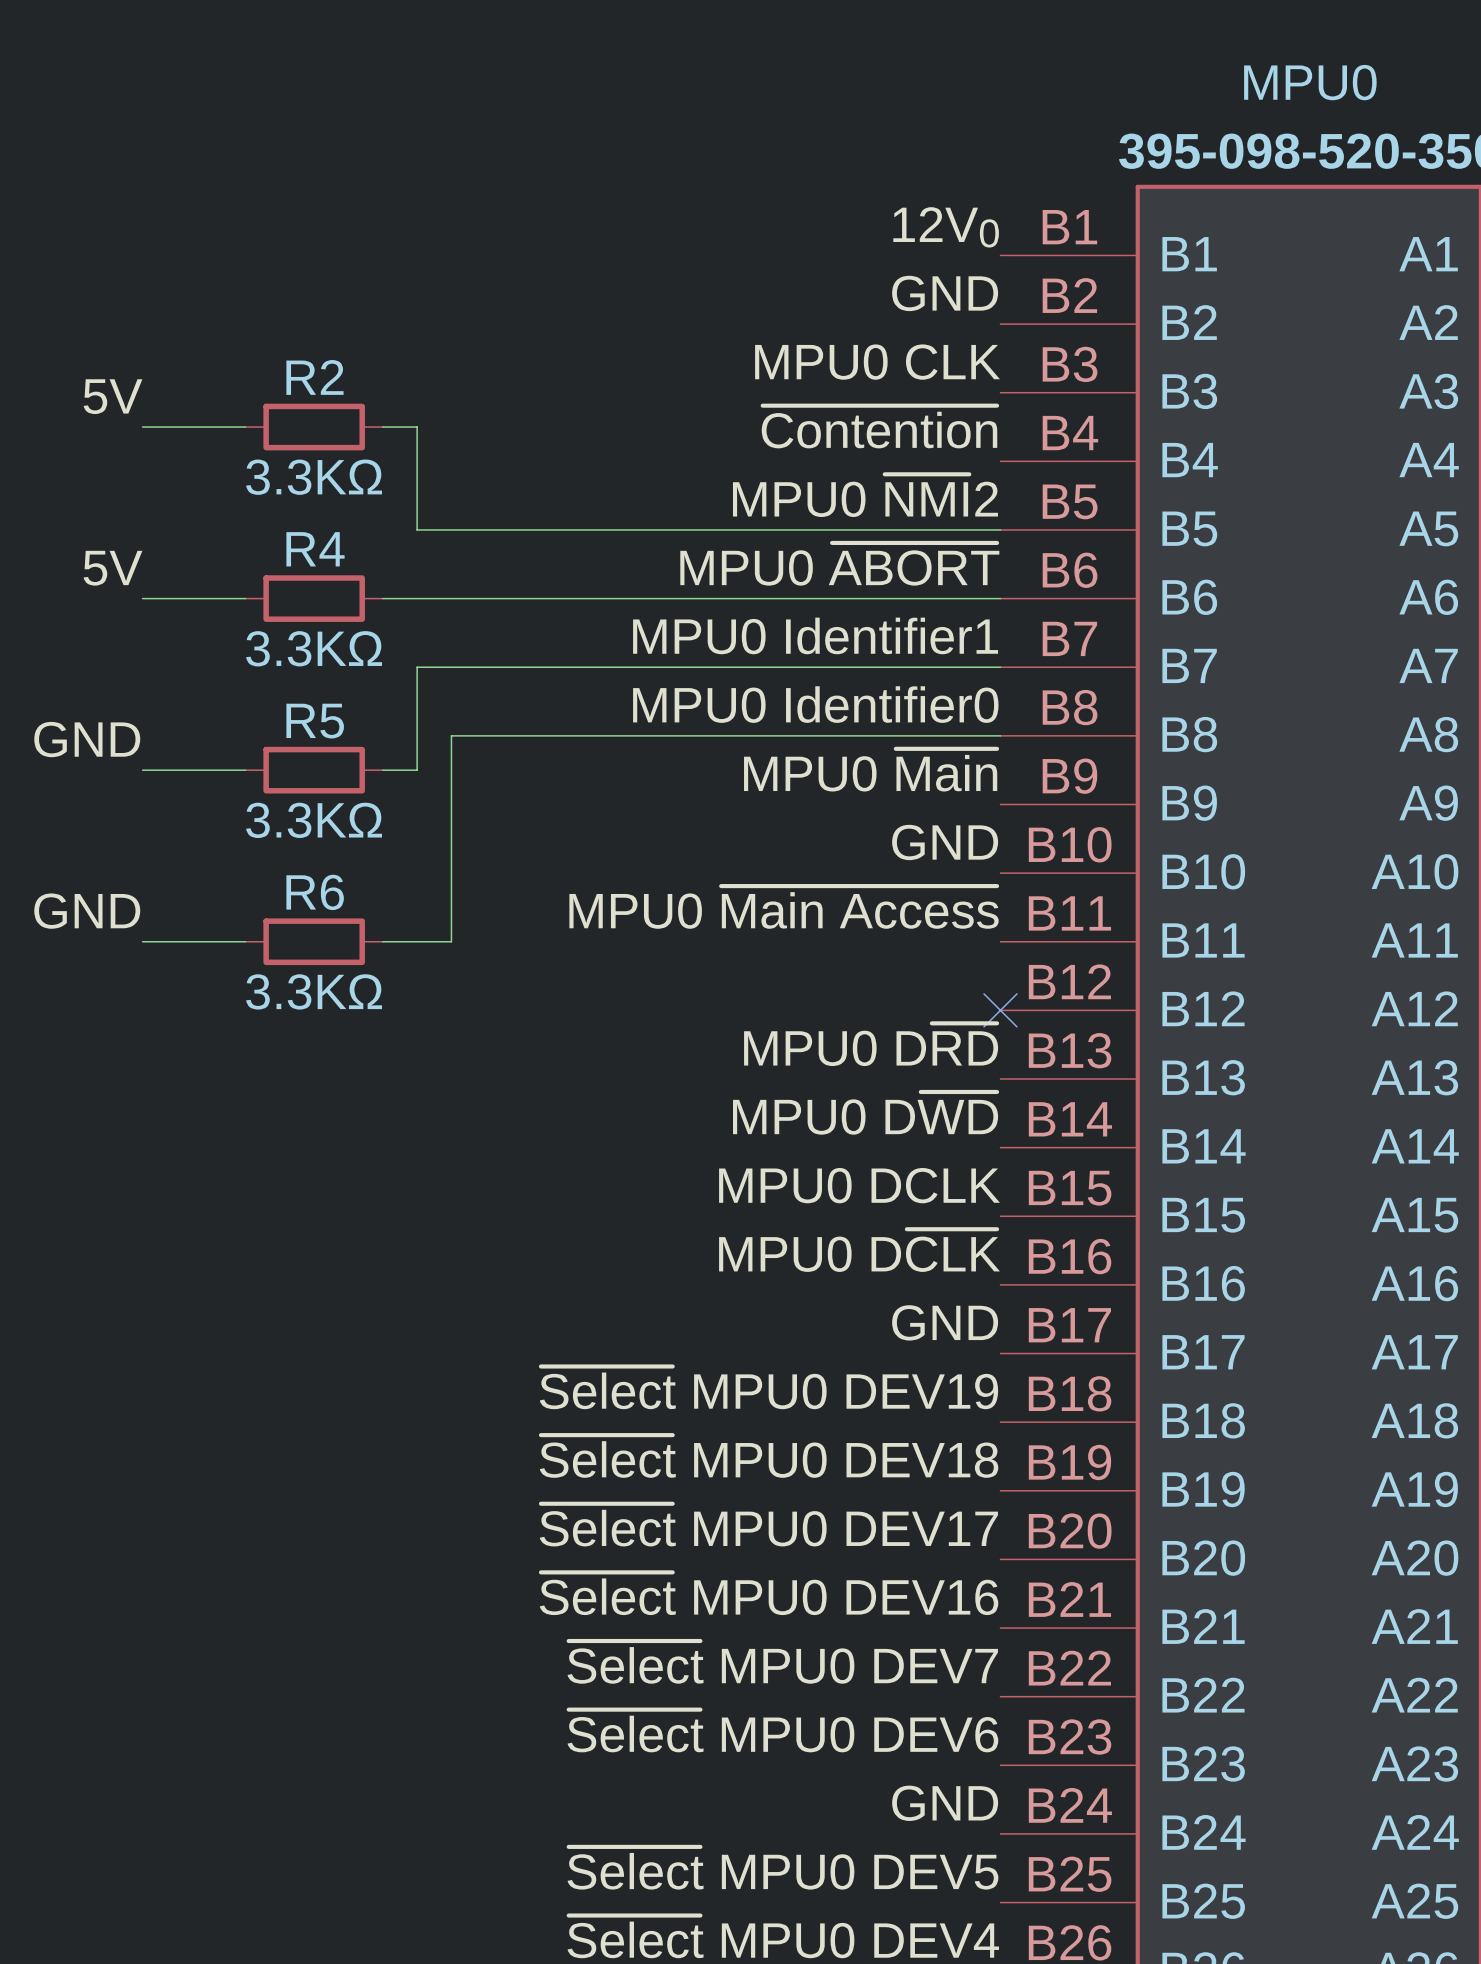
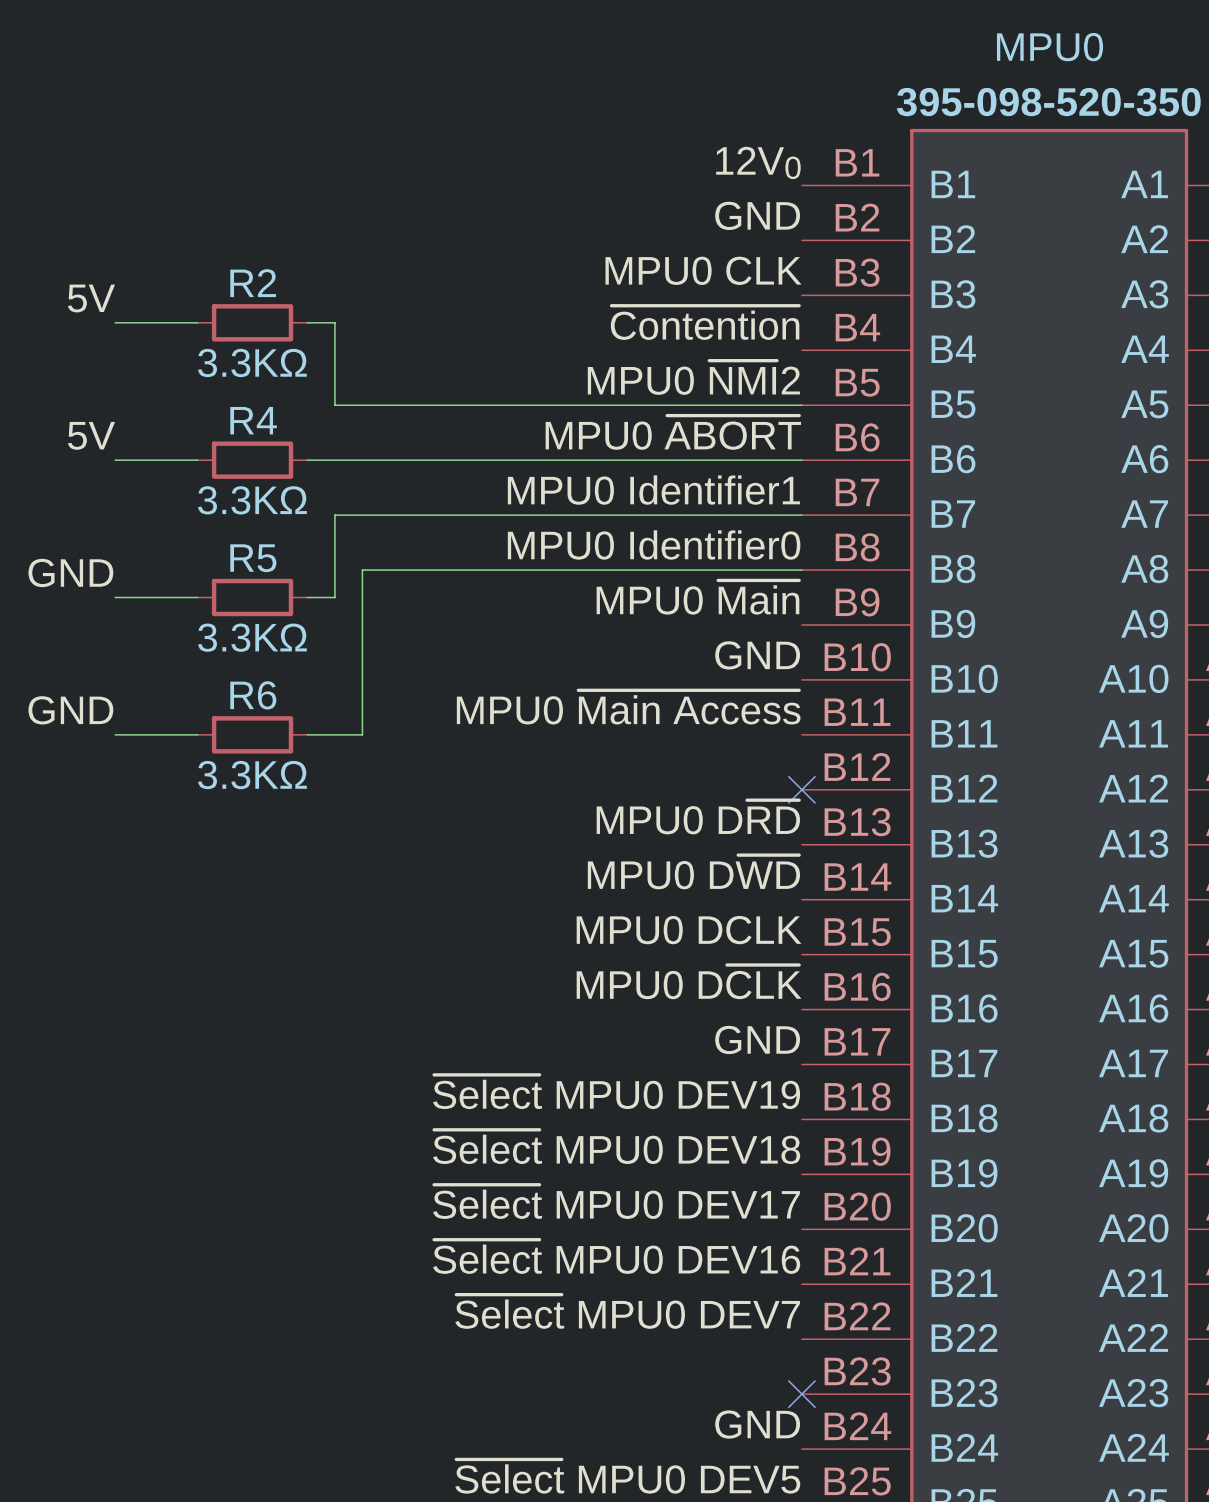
label: ~{Select} MPU0 DEV6 (782, 1730) -> none
no-connect mark: none -> (801, 1394)

